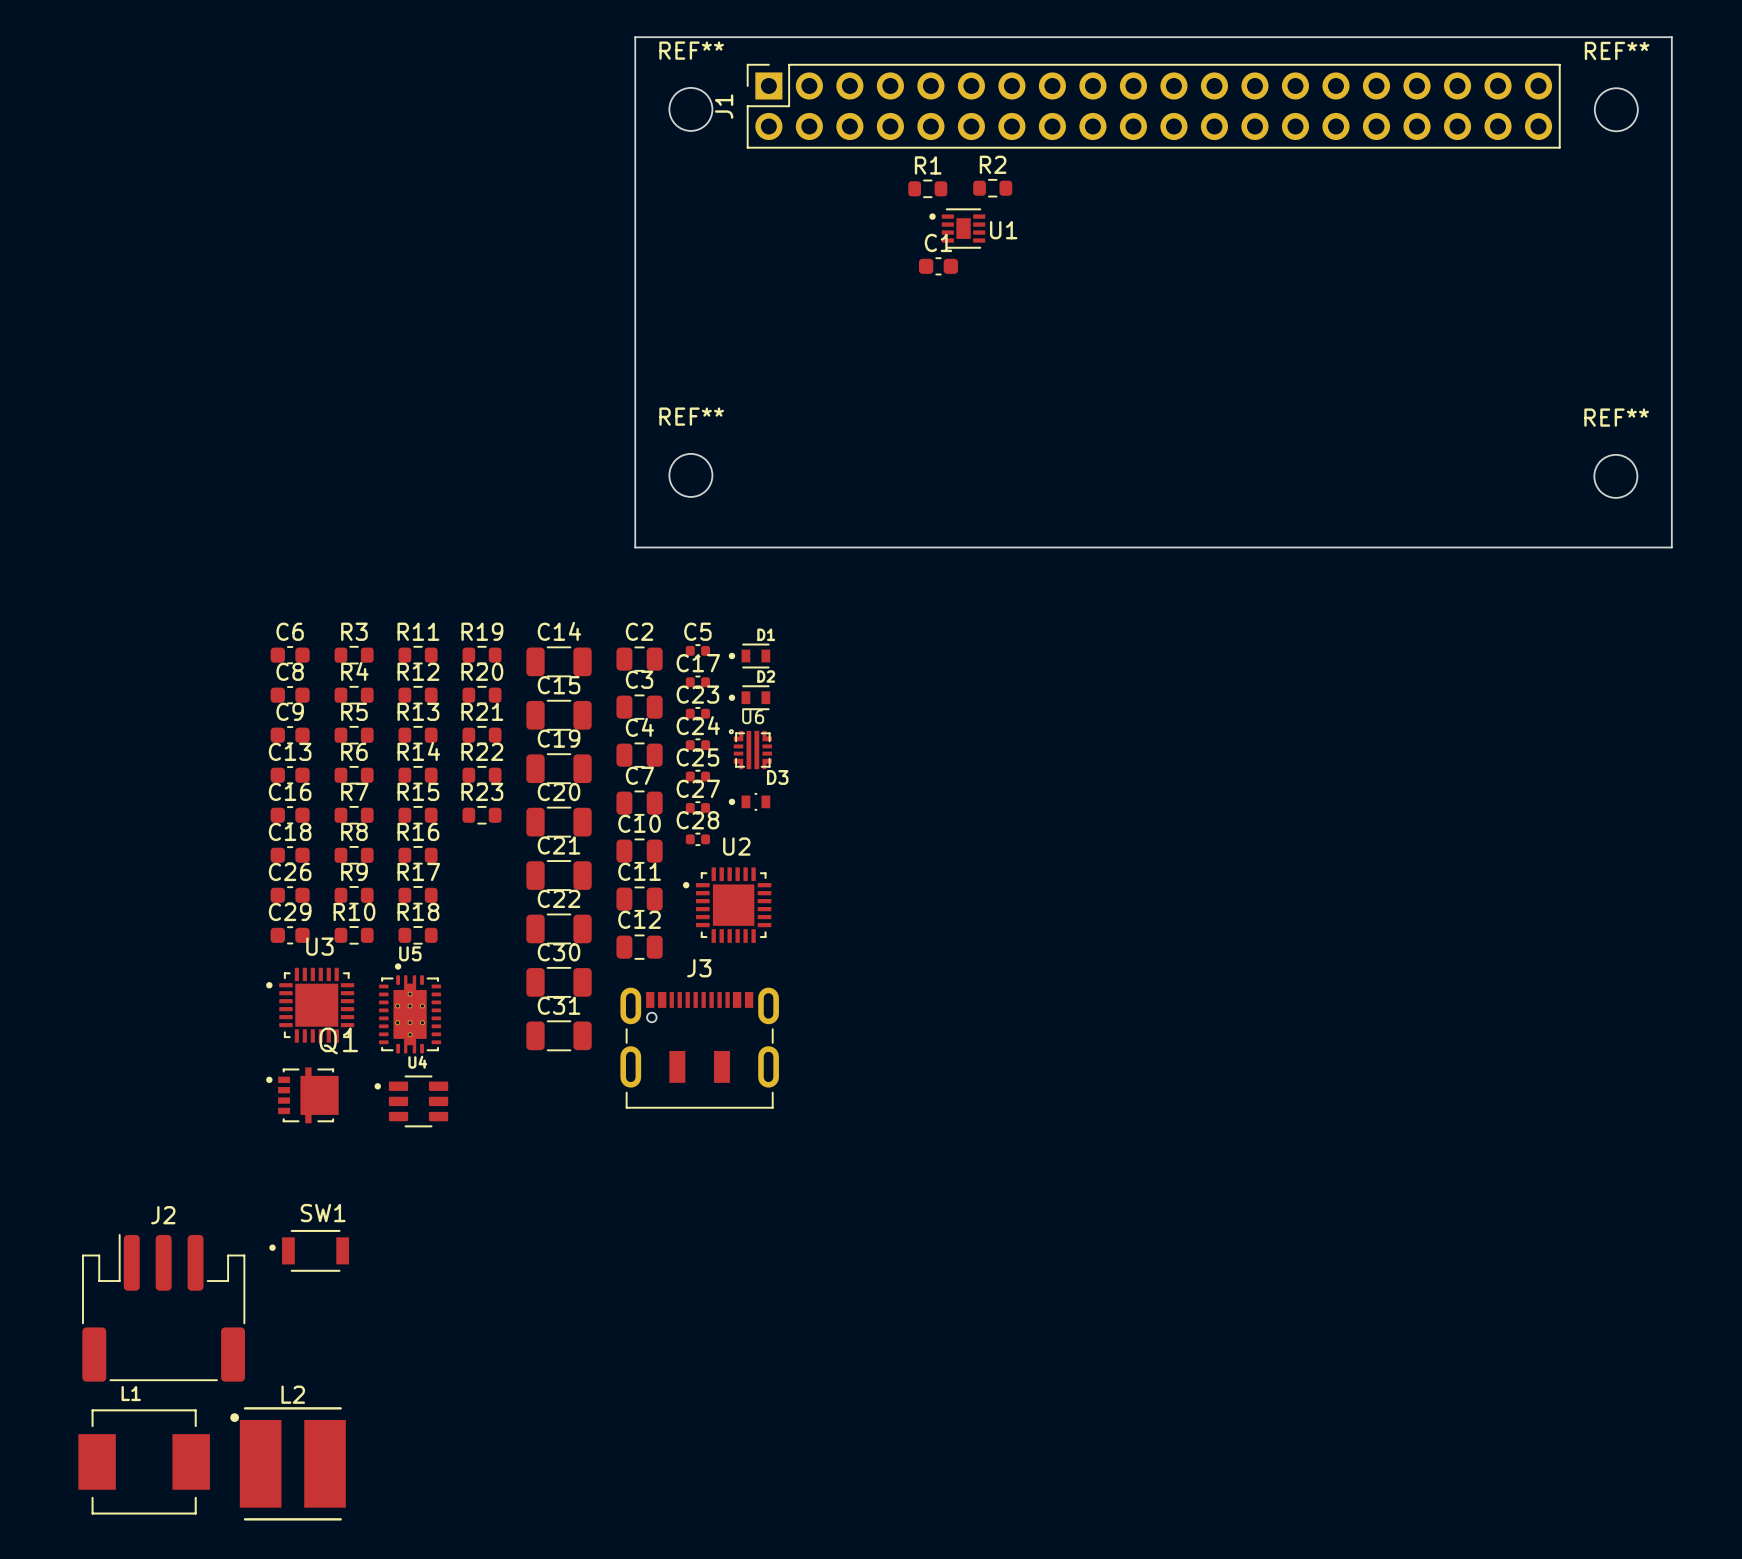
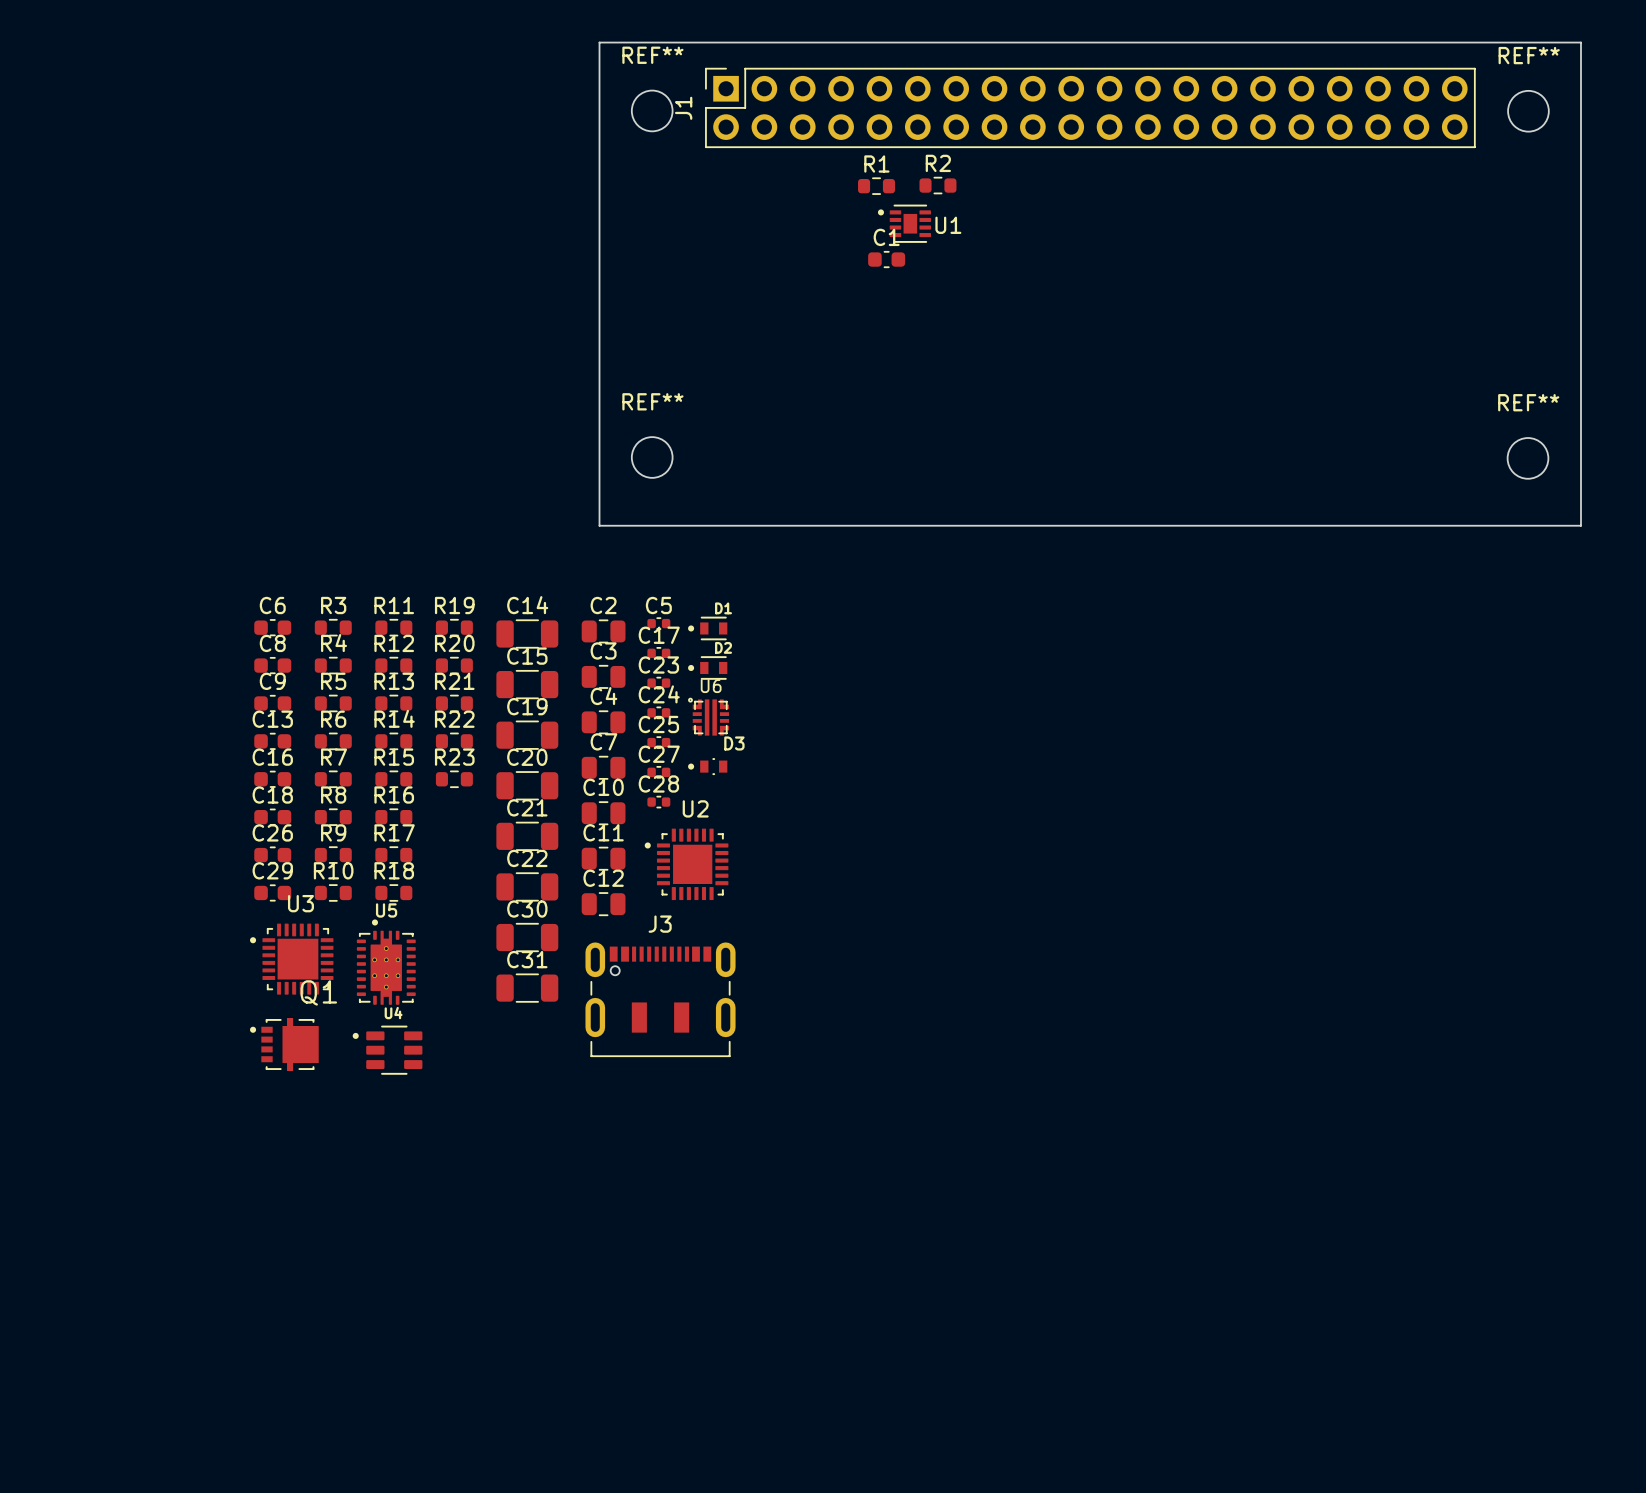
SW1: (309, 1250) -> none
J2: (163, 1307) -> none
L1: (144, 1461) -> none
L2: (288, 1463) -> none

